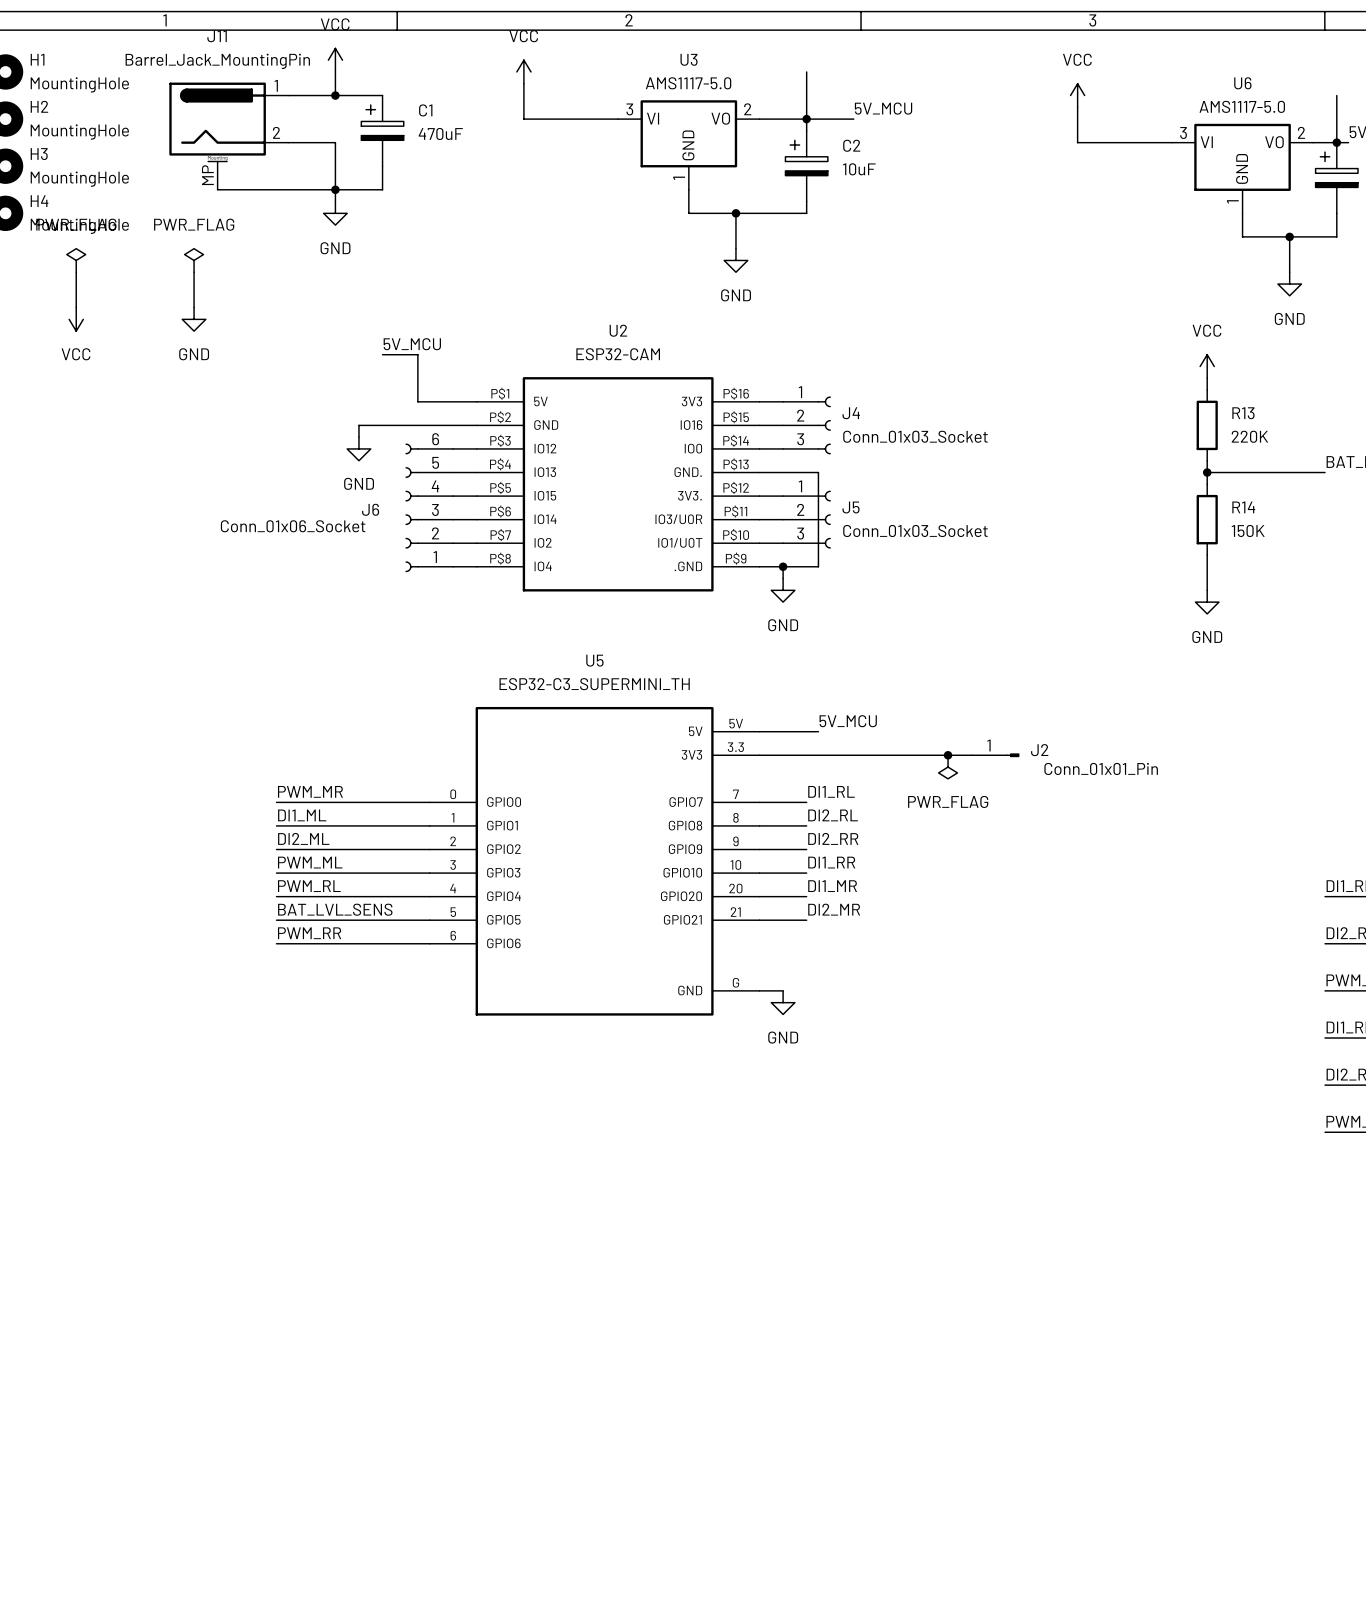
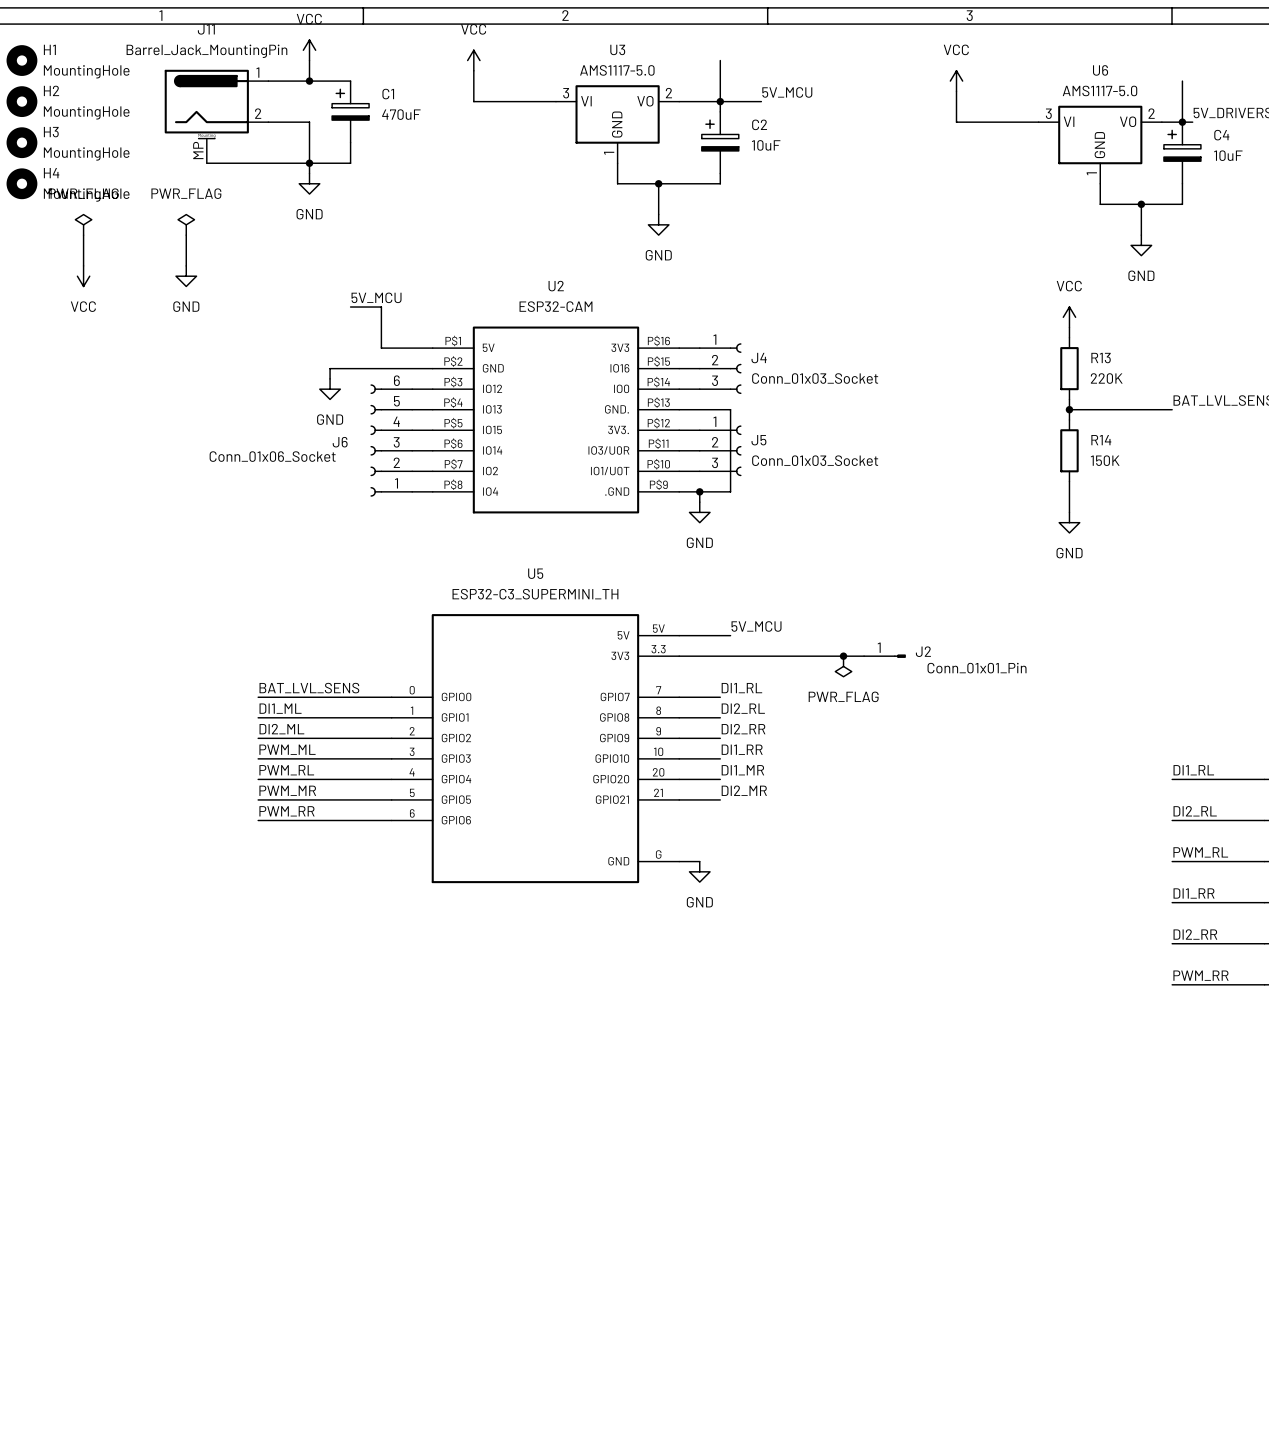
label: PWM_MR (310, 791) -> BAT_LVL_SENS (309, 688)
label: BAT_LVL_SENS (335, 909) -> PWM_MR (287, 790)

